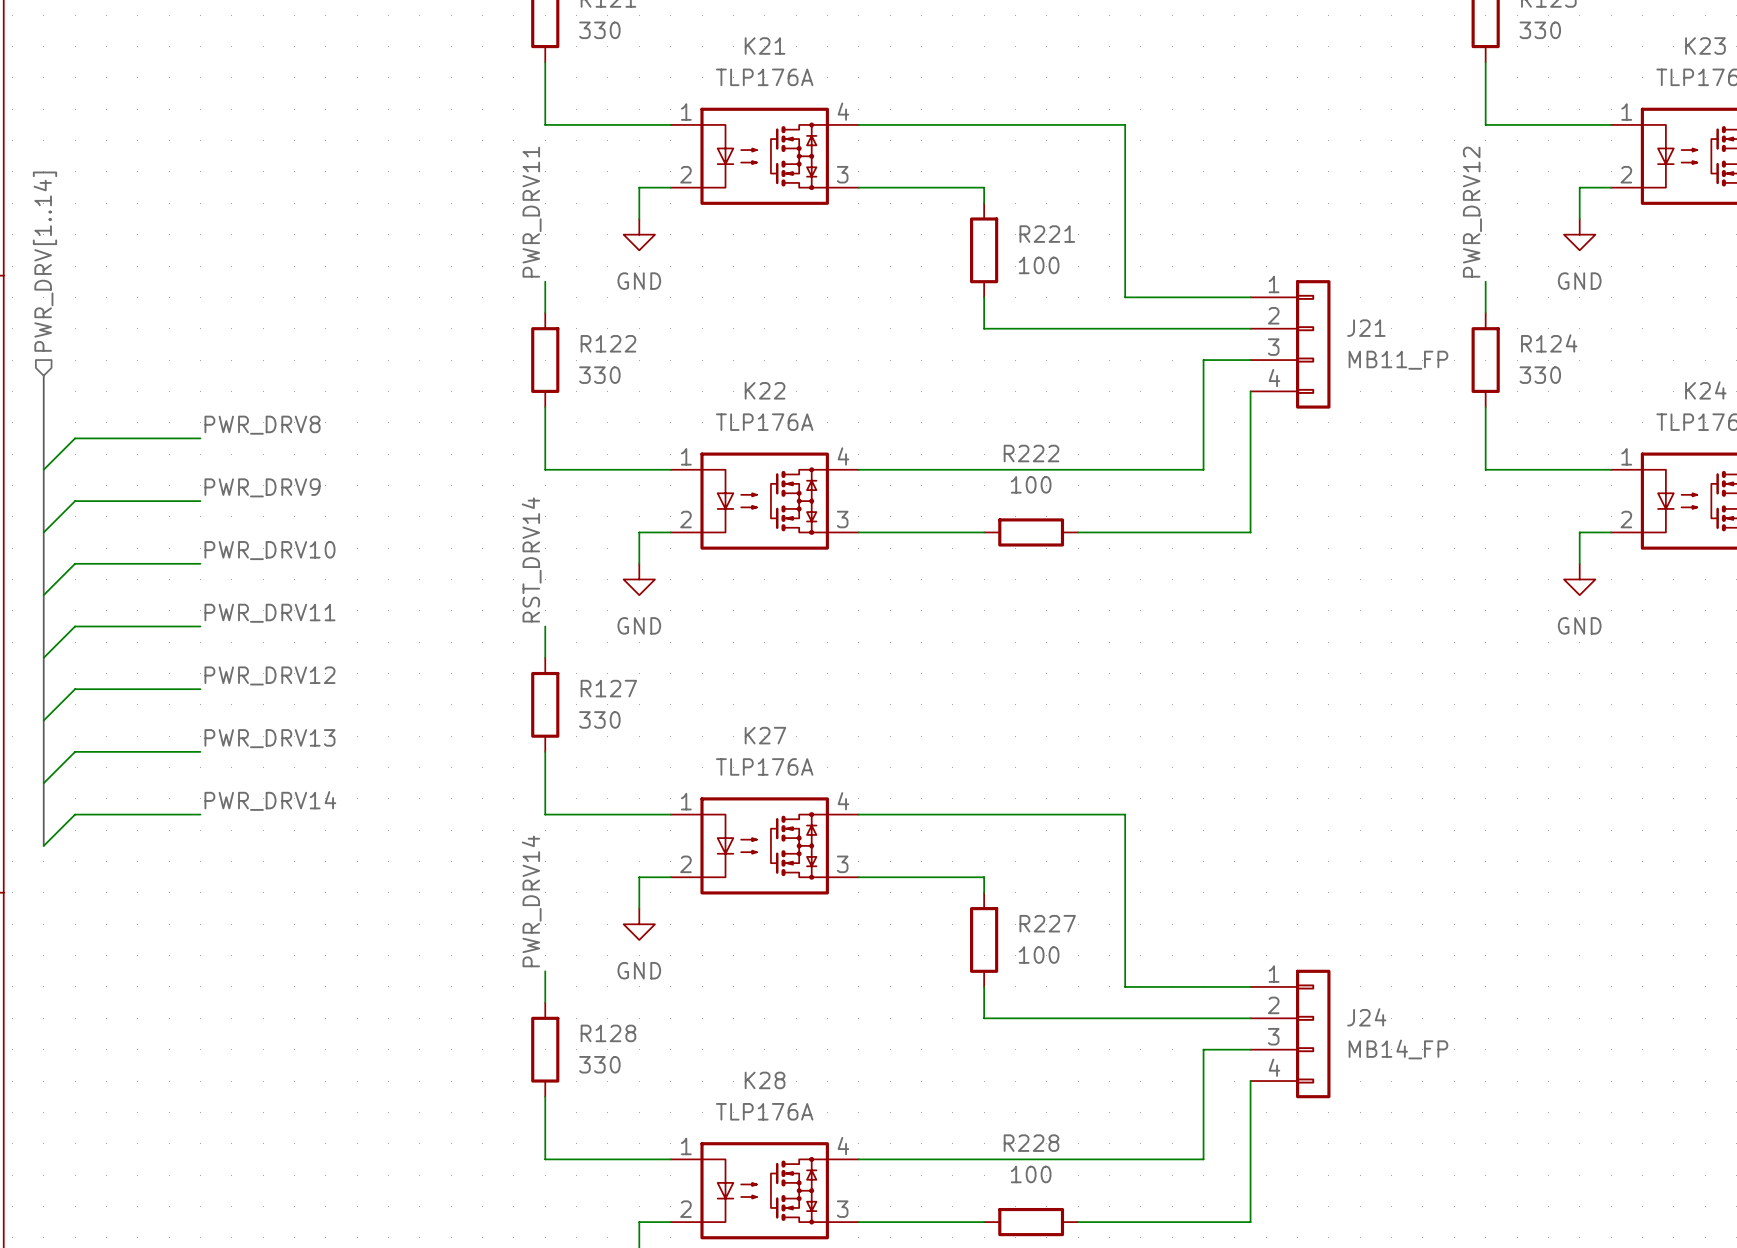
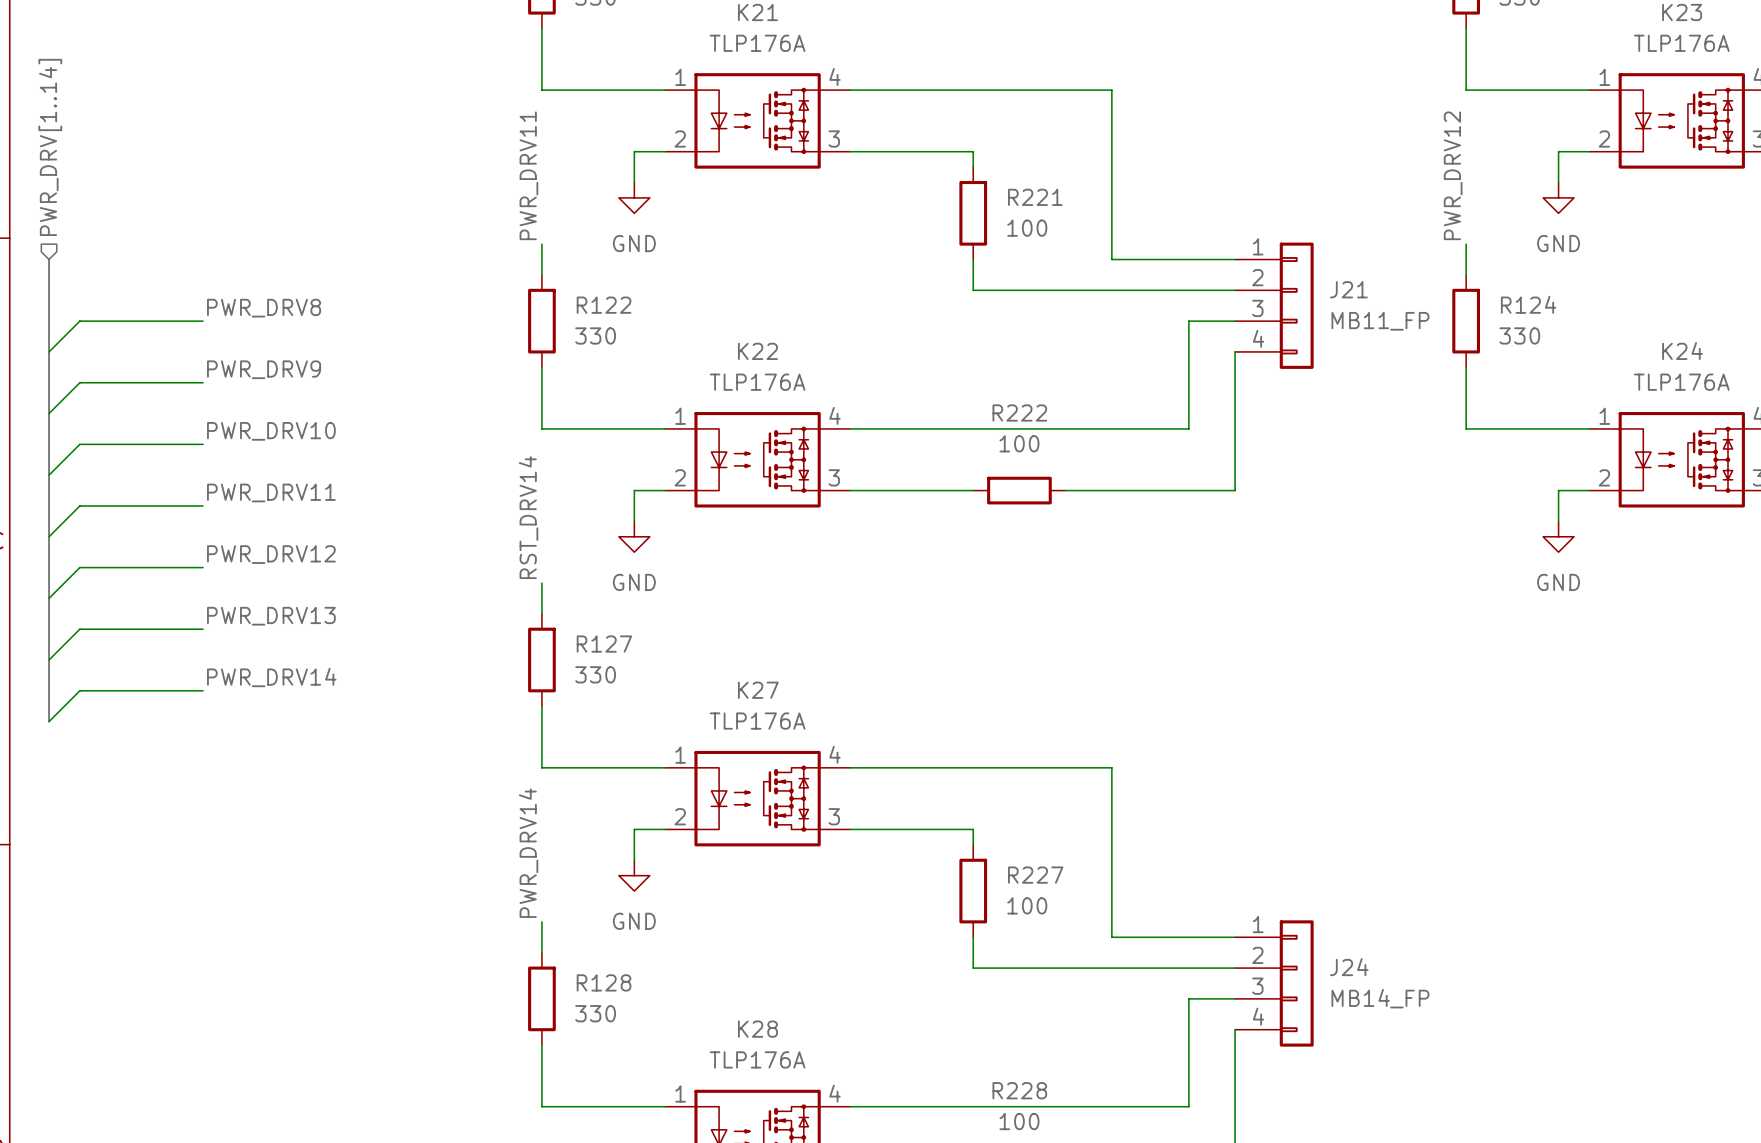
hierarchical label position: PWR_DRV[1..14] (45, 261) -> PWR_DRV[1..14] (50, 147)
bus: none -> (49, 259) (49, 336)
label position: PWR_DRV8 (262, 425) -> PWR_DRV8 (264, 308)
wire: (200, 438) (75, 438) (43, 469) -> (203, 321) (79, 321) (49, 351)
label position: PWR_DRV9 (262, 487) -> PWR_DRV9 (264, 369)
wire: (200, 501) (75, 501) (43, 532) -> (203, 382) (79, 382) (49, 413)
label position: PWR_DRV10 (269, 550) -> PWR_DRV10 (271, 431)
wire: (200, 563) (75, 563) (43, 595) -> (203, 444) (79, 444) (49, 475)
label position: PWR_DRV11 (269, 613) -> PWR_DRV11 (271, 492)
wire: (200, 626) (75, 626) (43, 657) -> (203, 505) (79, 505) (49, 536)
label position: PWR_DRV12 (269, 675) -> PWR_DRV12 (271, 554)
wire: (200, 689) (75, 689) (43, 720) -> (203, 567) (79, 567) (49, 598)
label position: PWR_DRV13 (269, 738) -> PWR_DRV13 (271, 616)
wire: (200, 751) (75, 751) (43, 783) -> (203, 629) (79, 629) (49, 660)
bus: (43, 767) (43, 845) -> none
label position: PWR_DRV14 (270, 800) -> PWR_DRV14 (271, 677)
wire: (200, 814) (75, 814) (43, 845) -> (203, 690) (79, 690) (49, 721)

